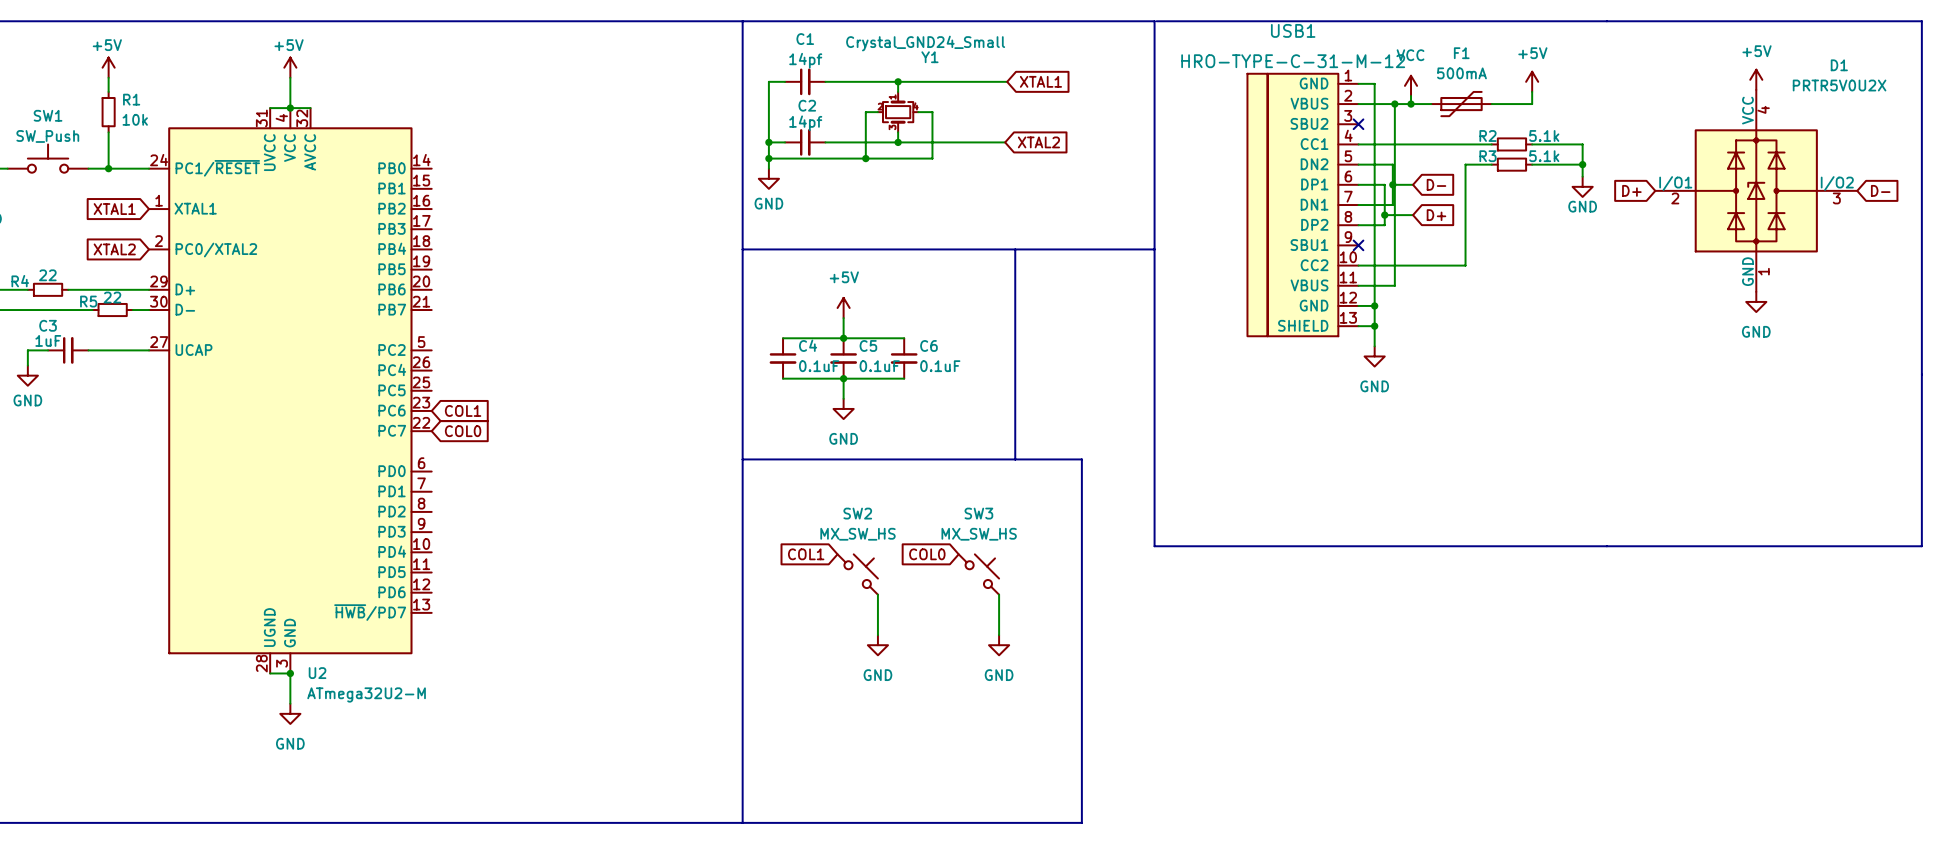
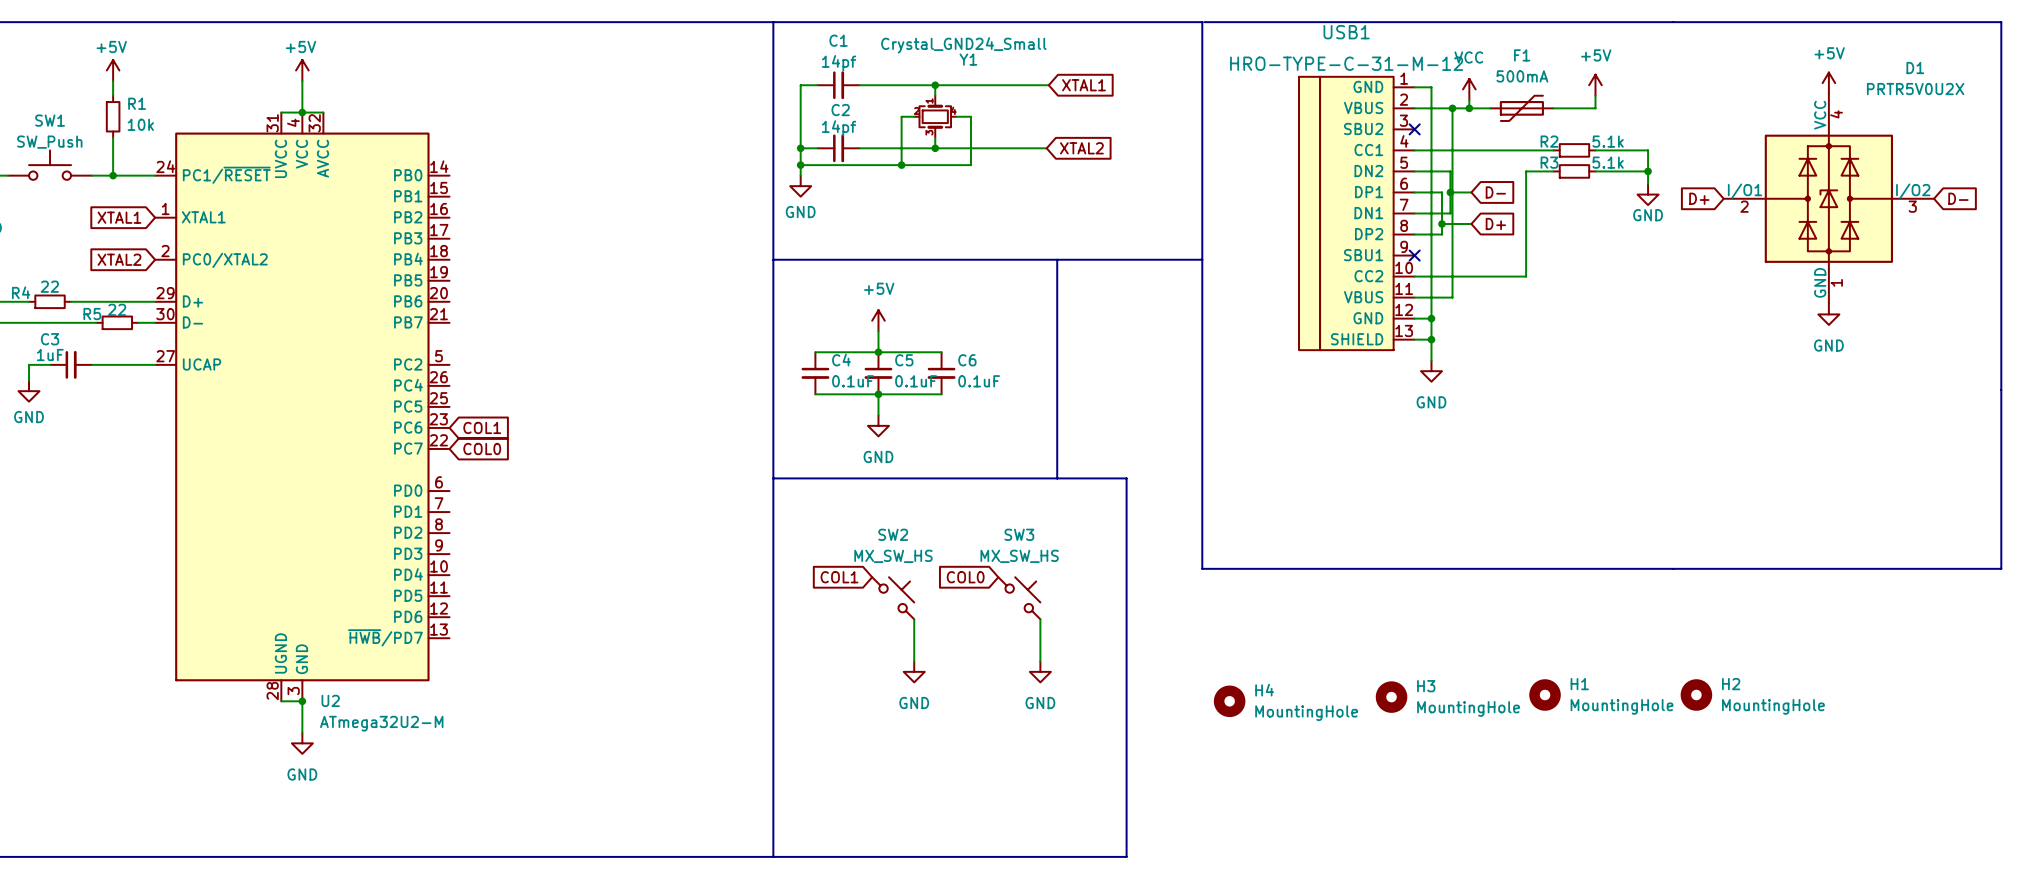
H1: none -> MountingHole (1545, 695)
H2: none -> MountingHole (1696, 695)
H3: none -> MountingHole (1391, 697)
H4: none -> MountingHole (1229, 701)

